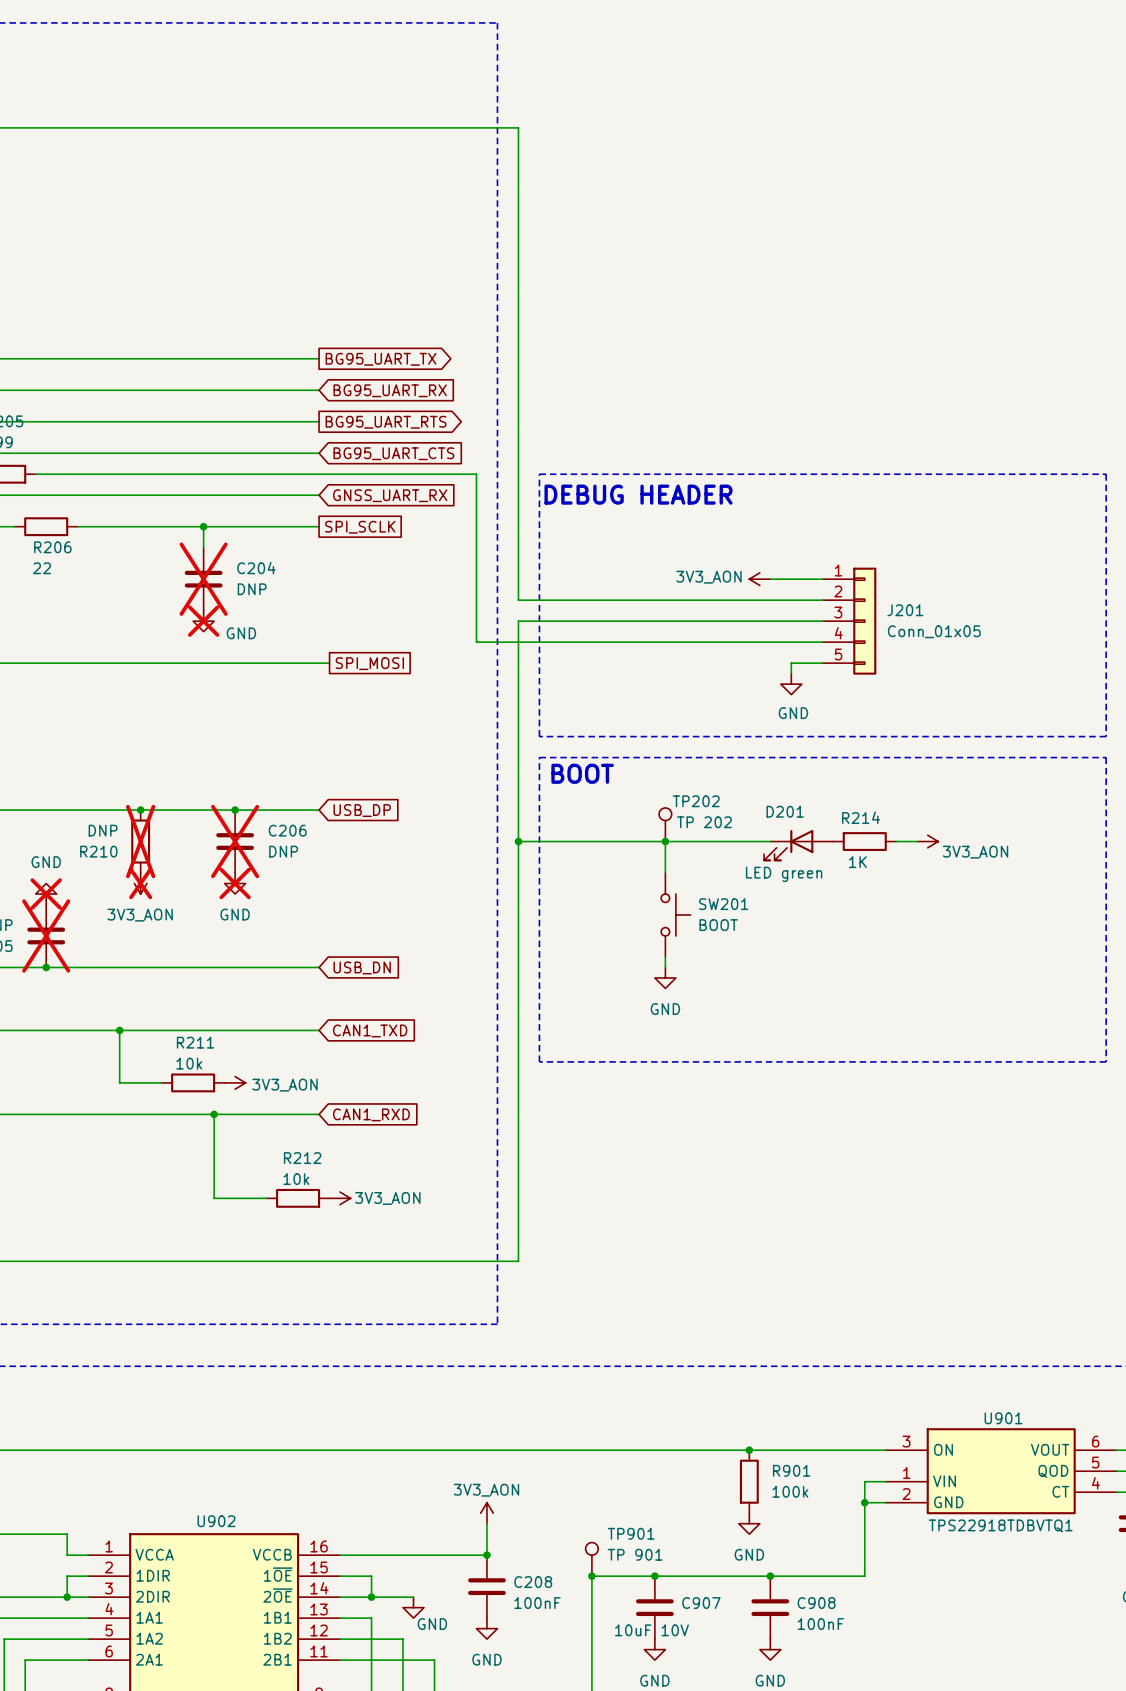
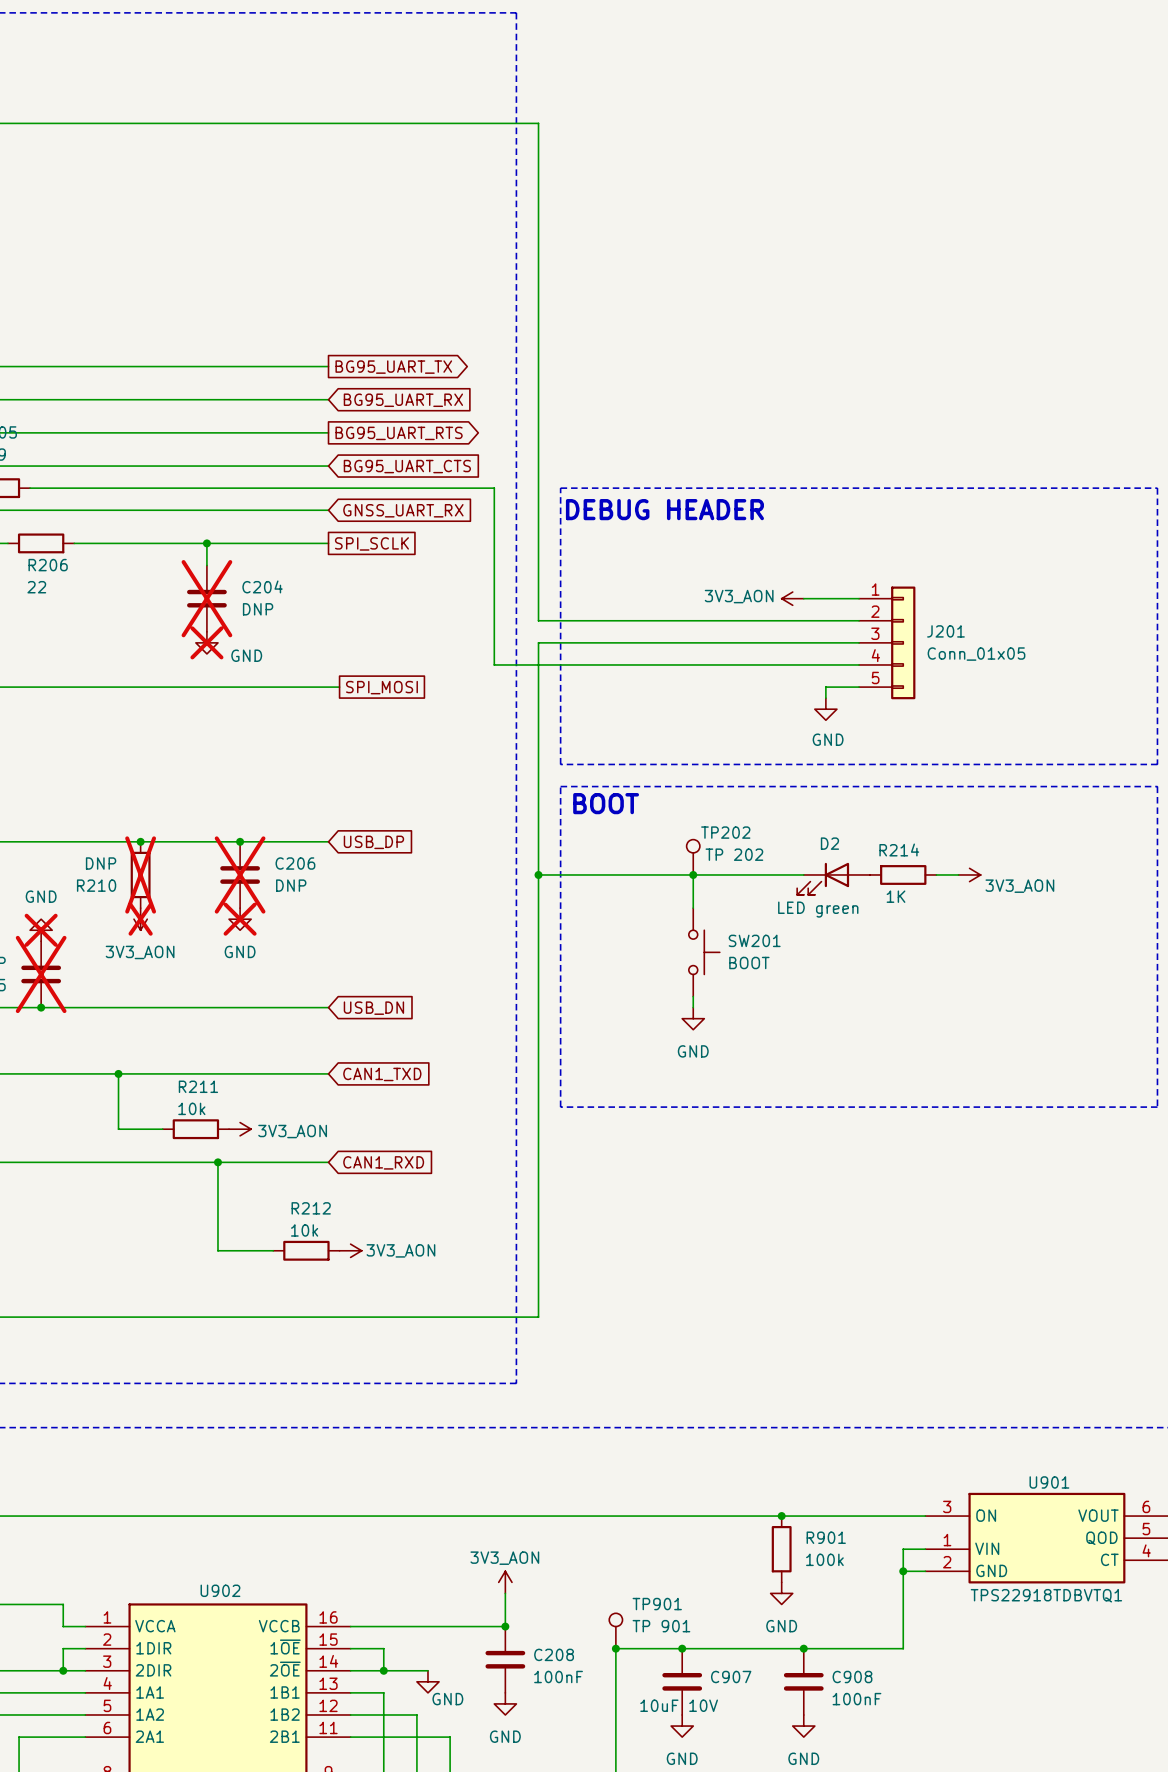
D201 name: D201 (785, 811) -> D2 (829, 843)

